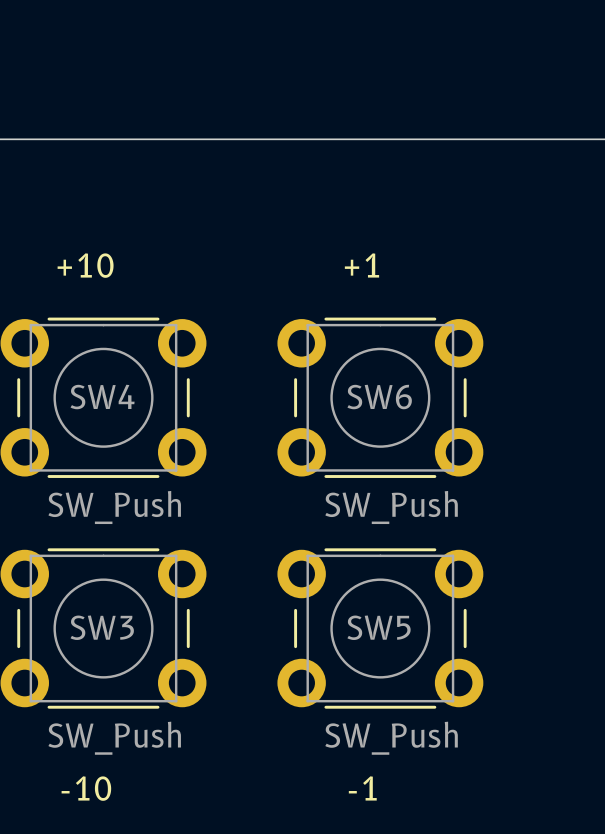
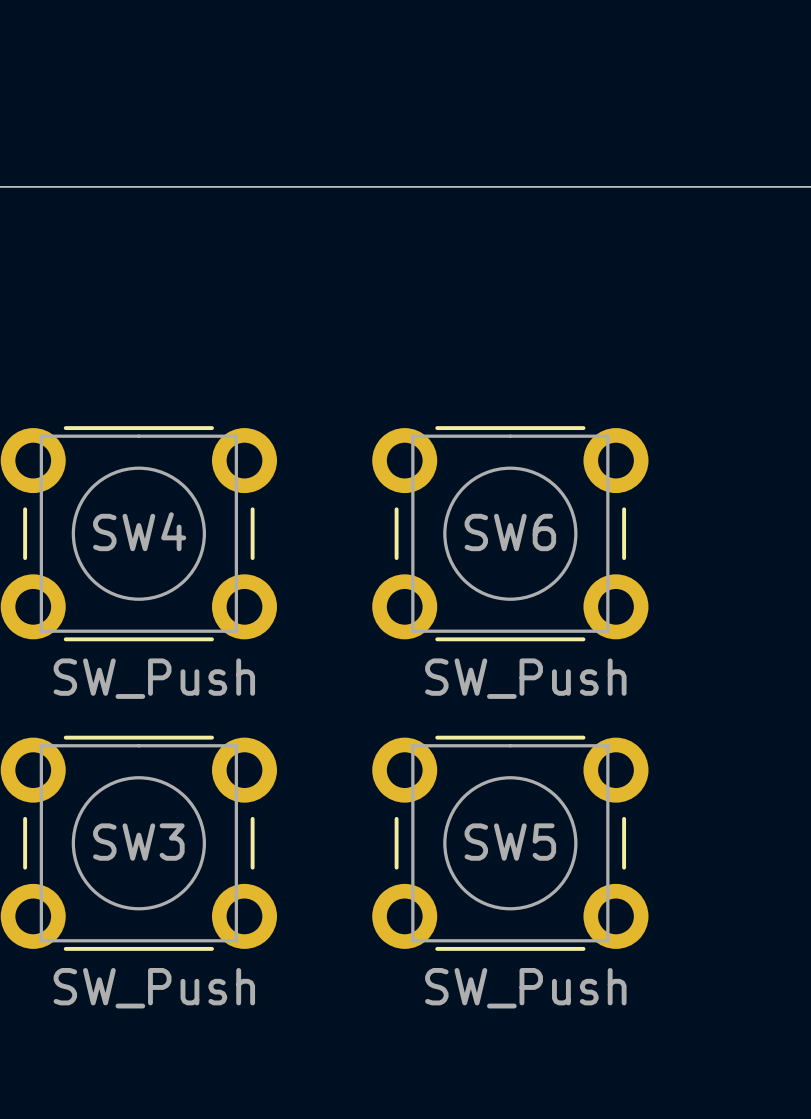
text: +10 (85, 265) -> none
text: +1 (361, 265) -> none
text: -10 (86, 788) -> none
text: -1 (362, 788) -> none

